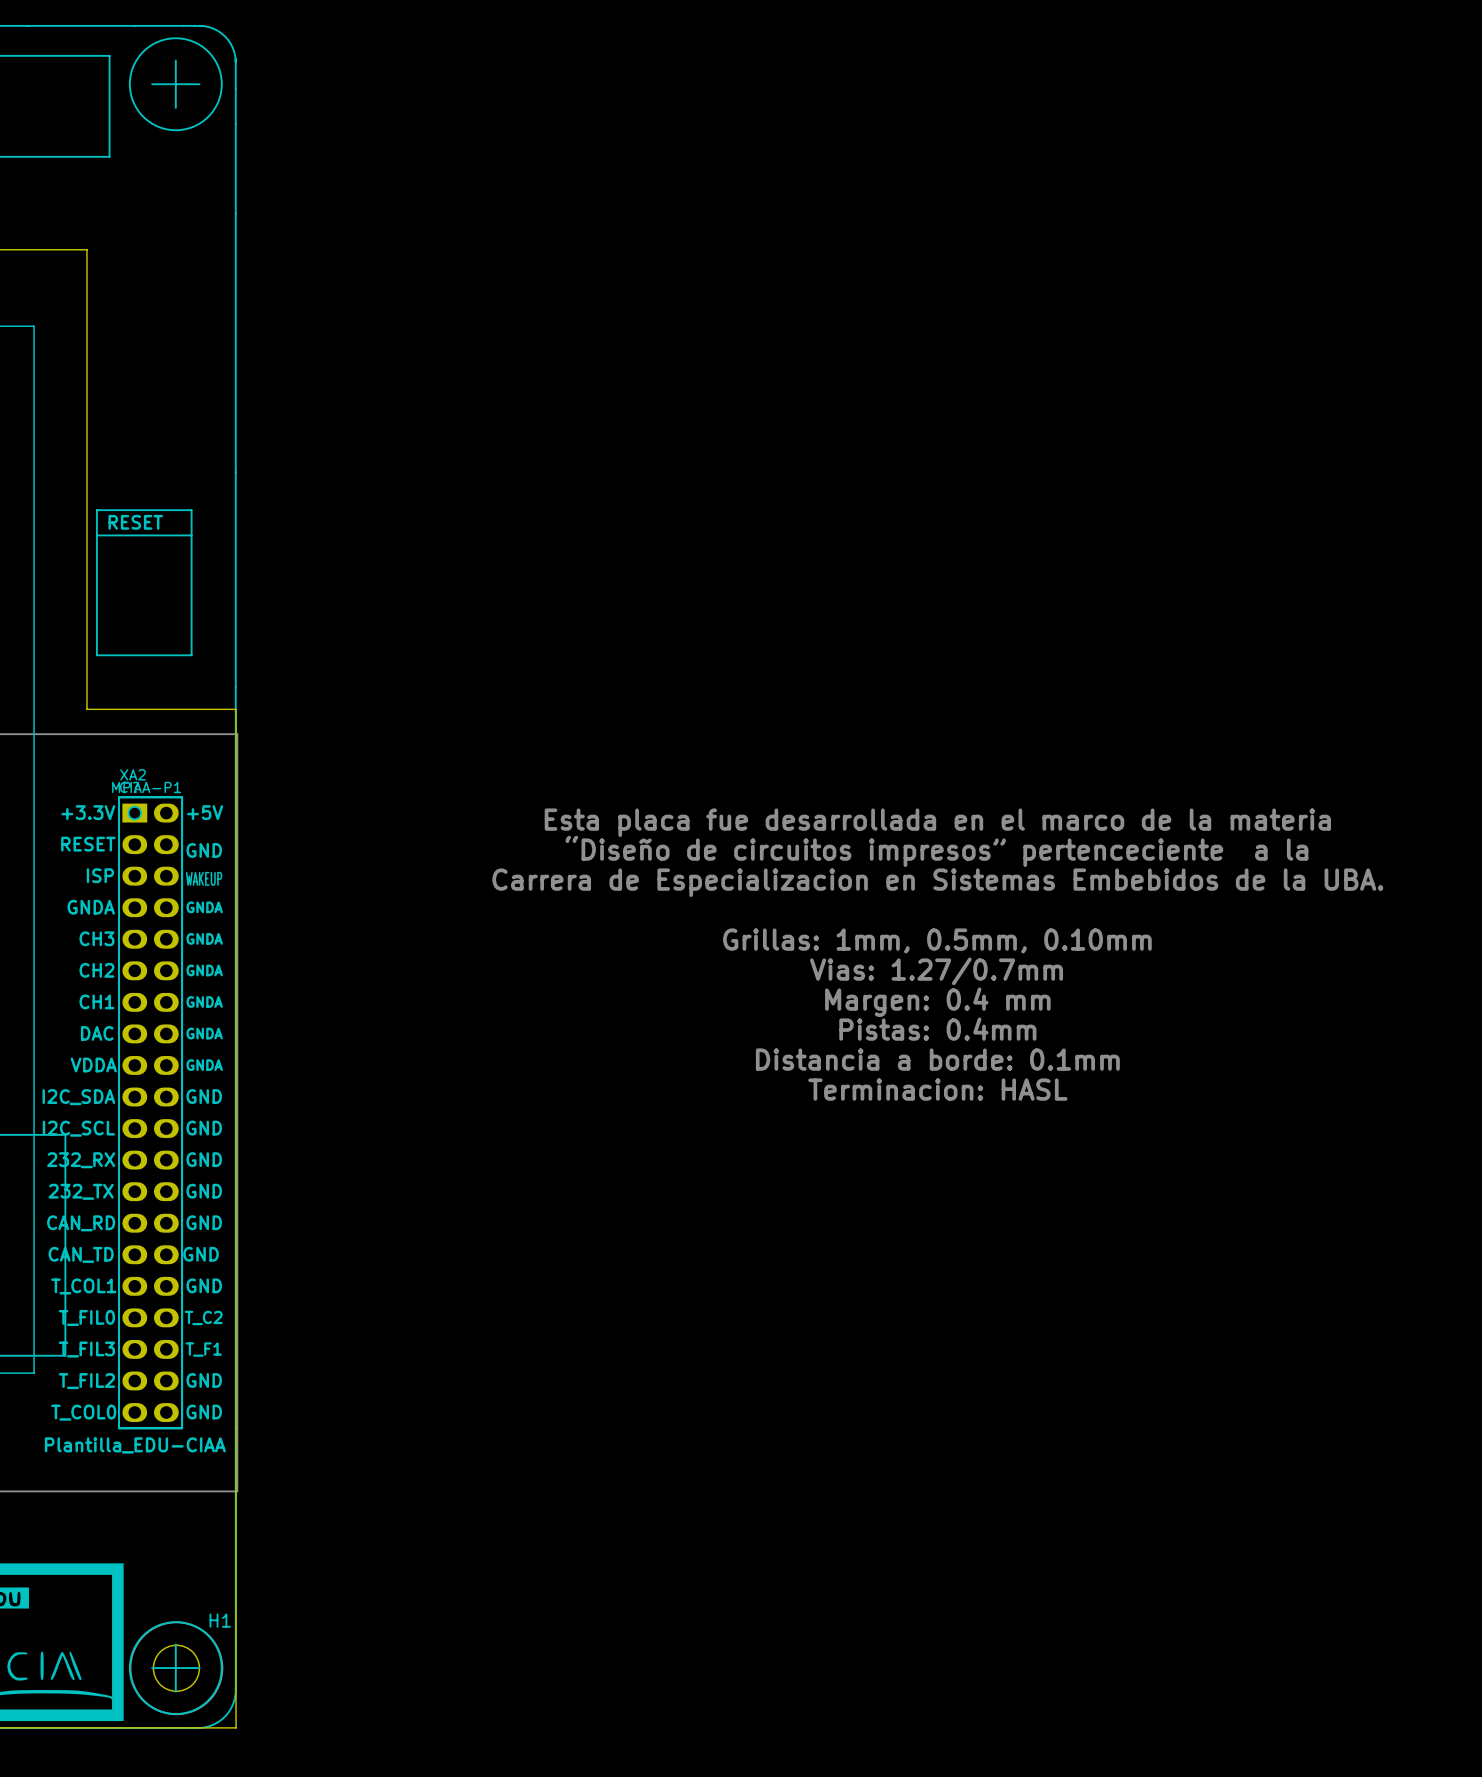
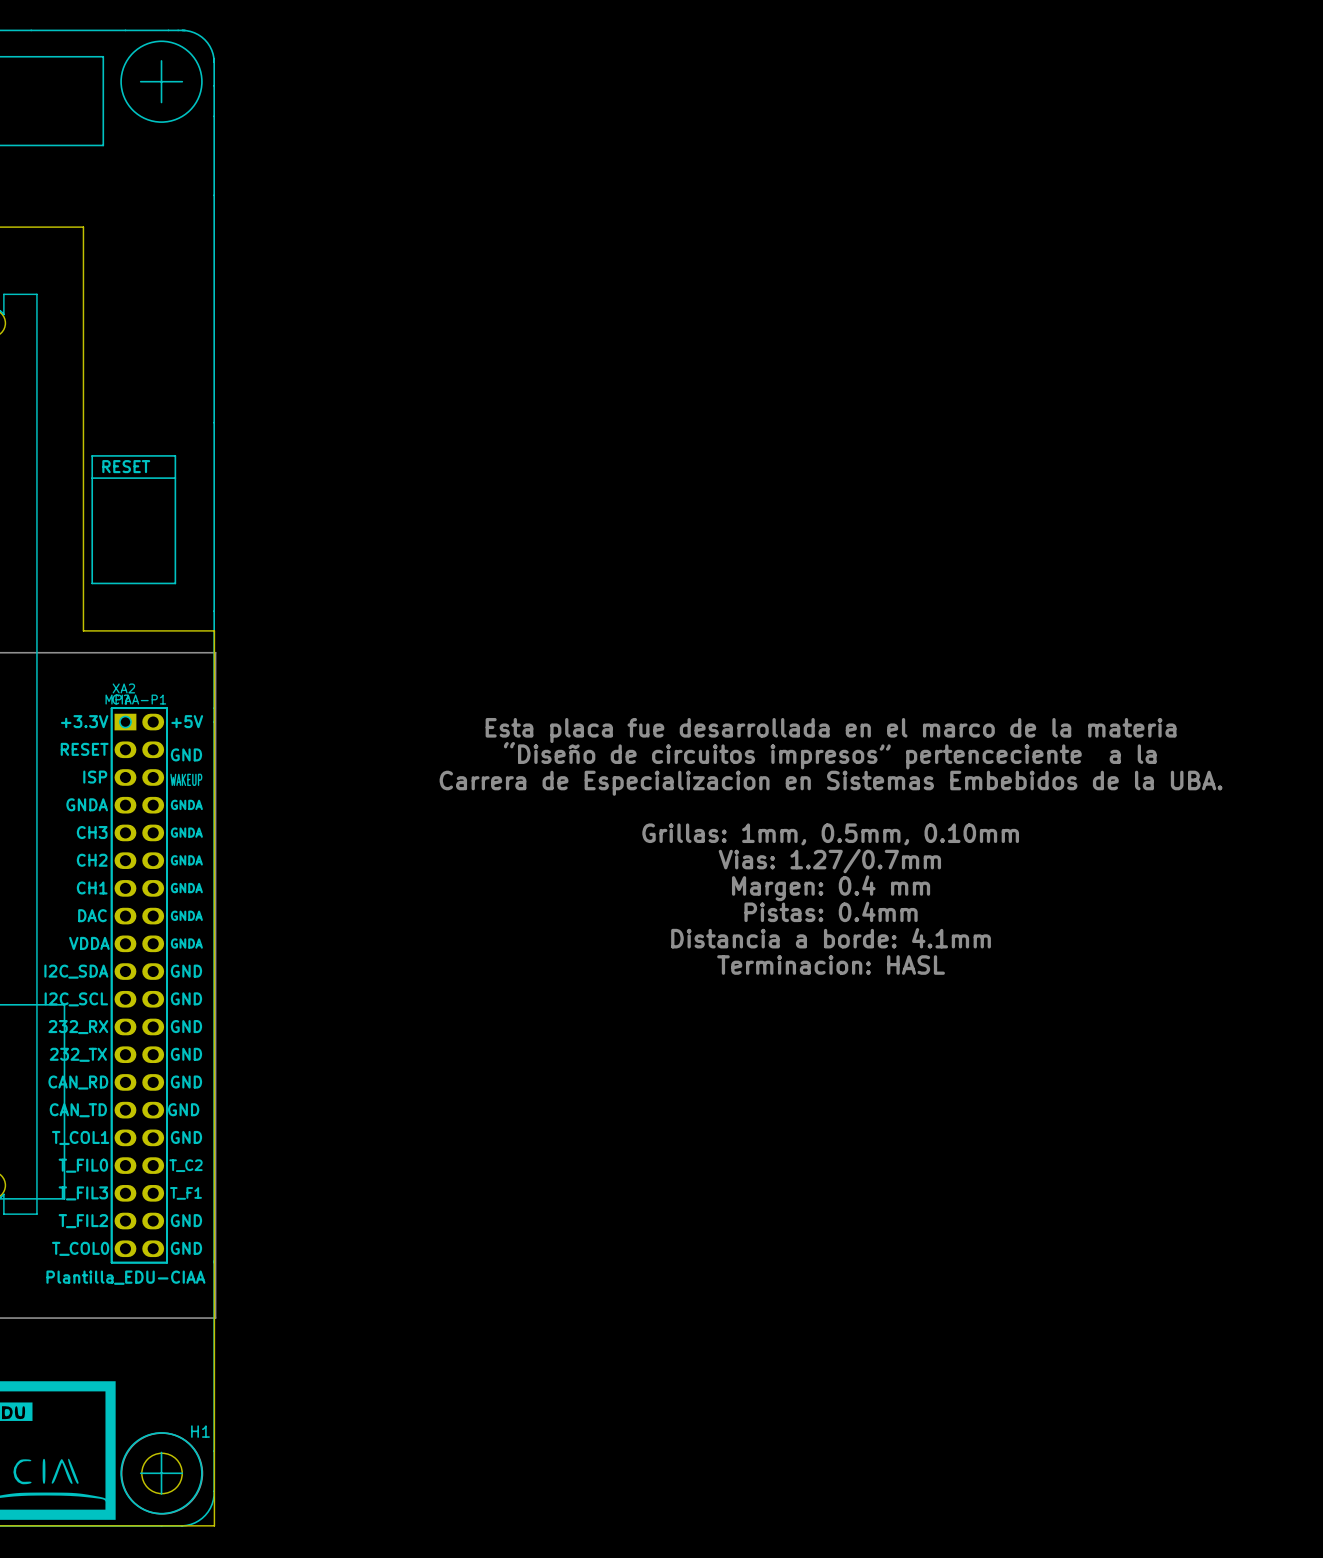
text: Distancia a borde: 0.1mm (937, 1059) -> Distancia a borde: 4.1mm (831, 938)

